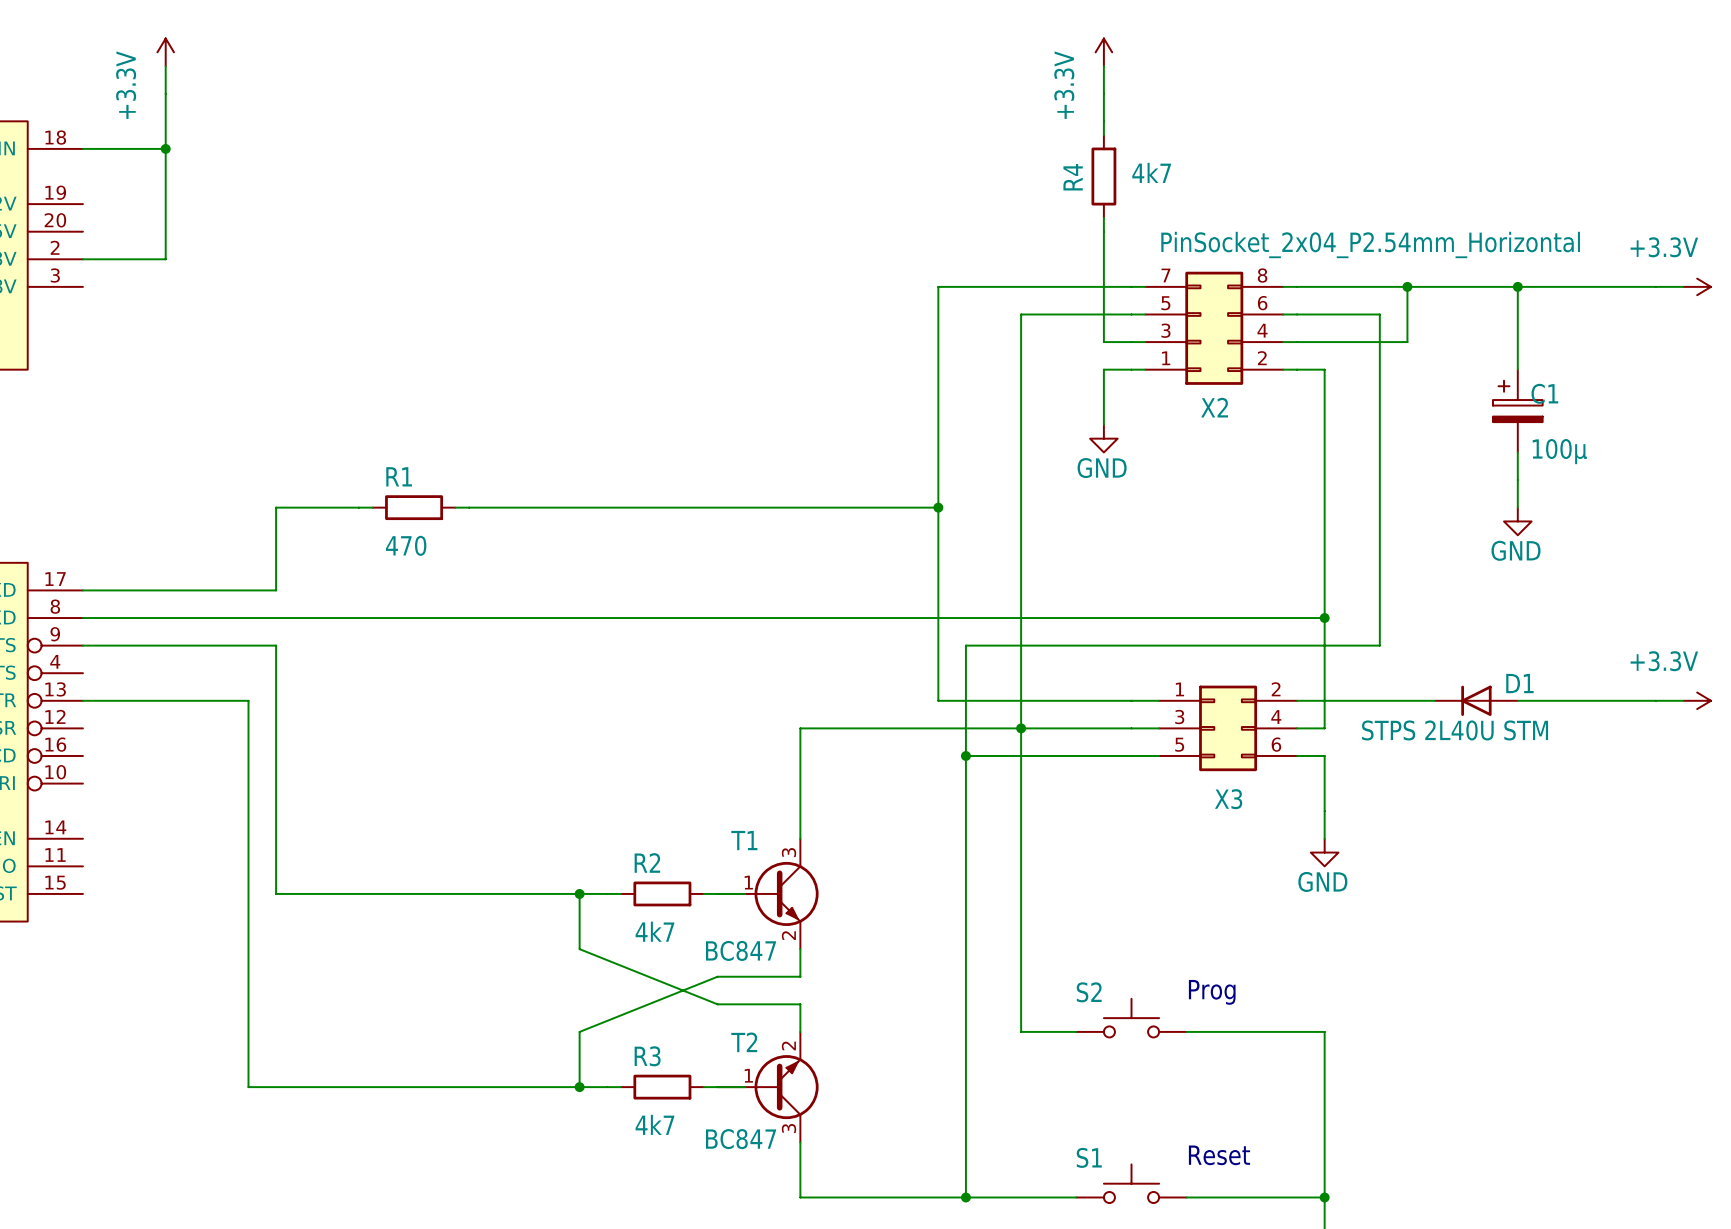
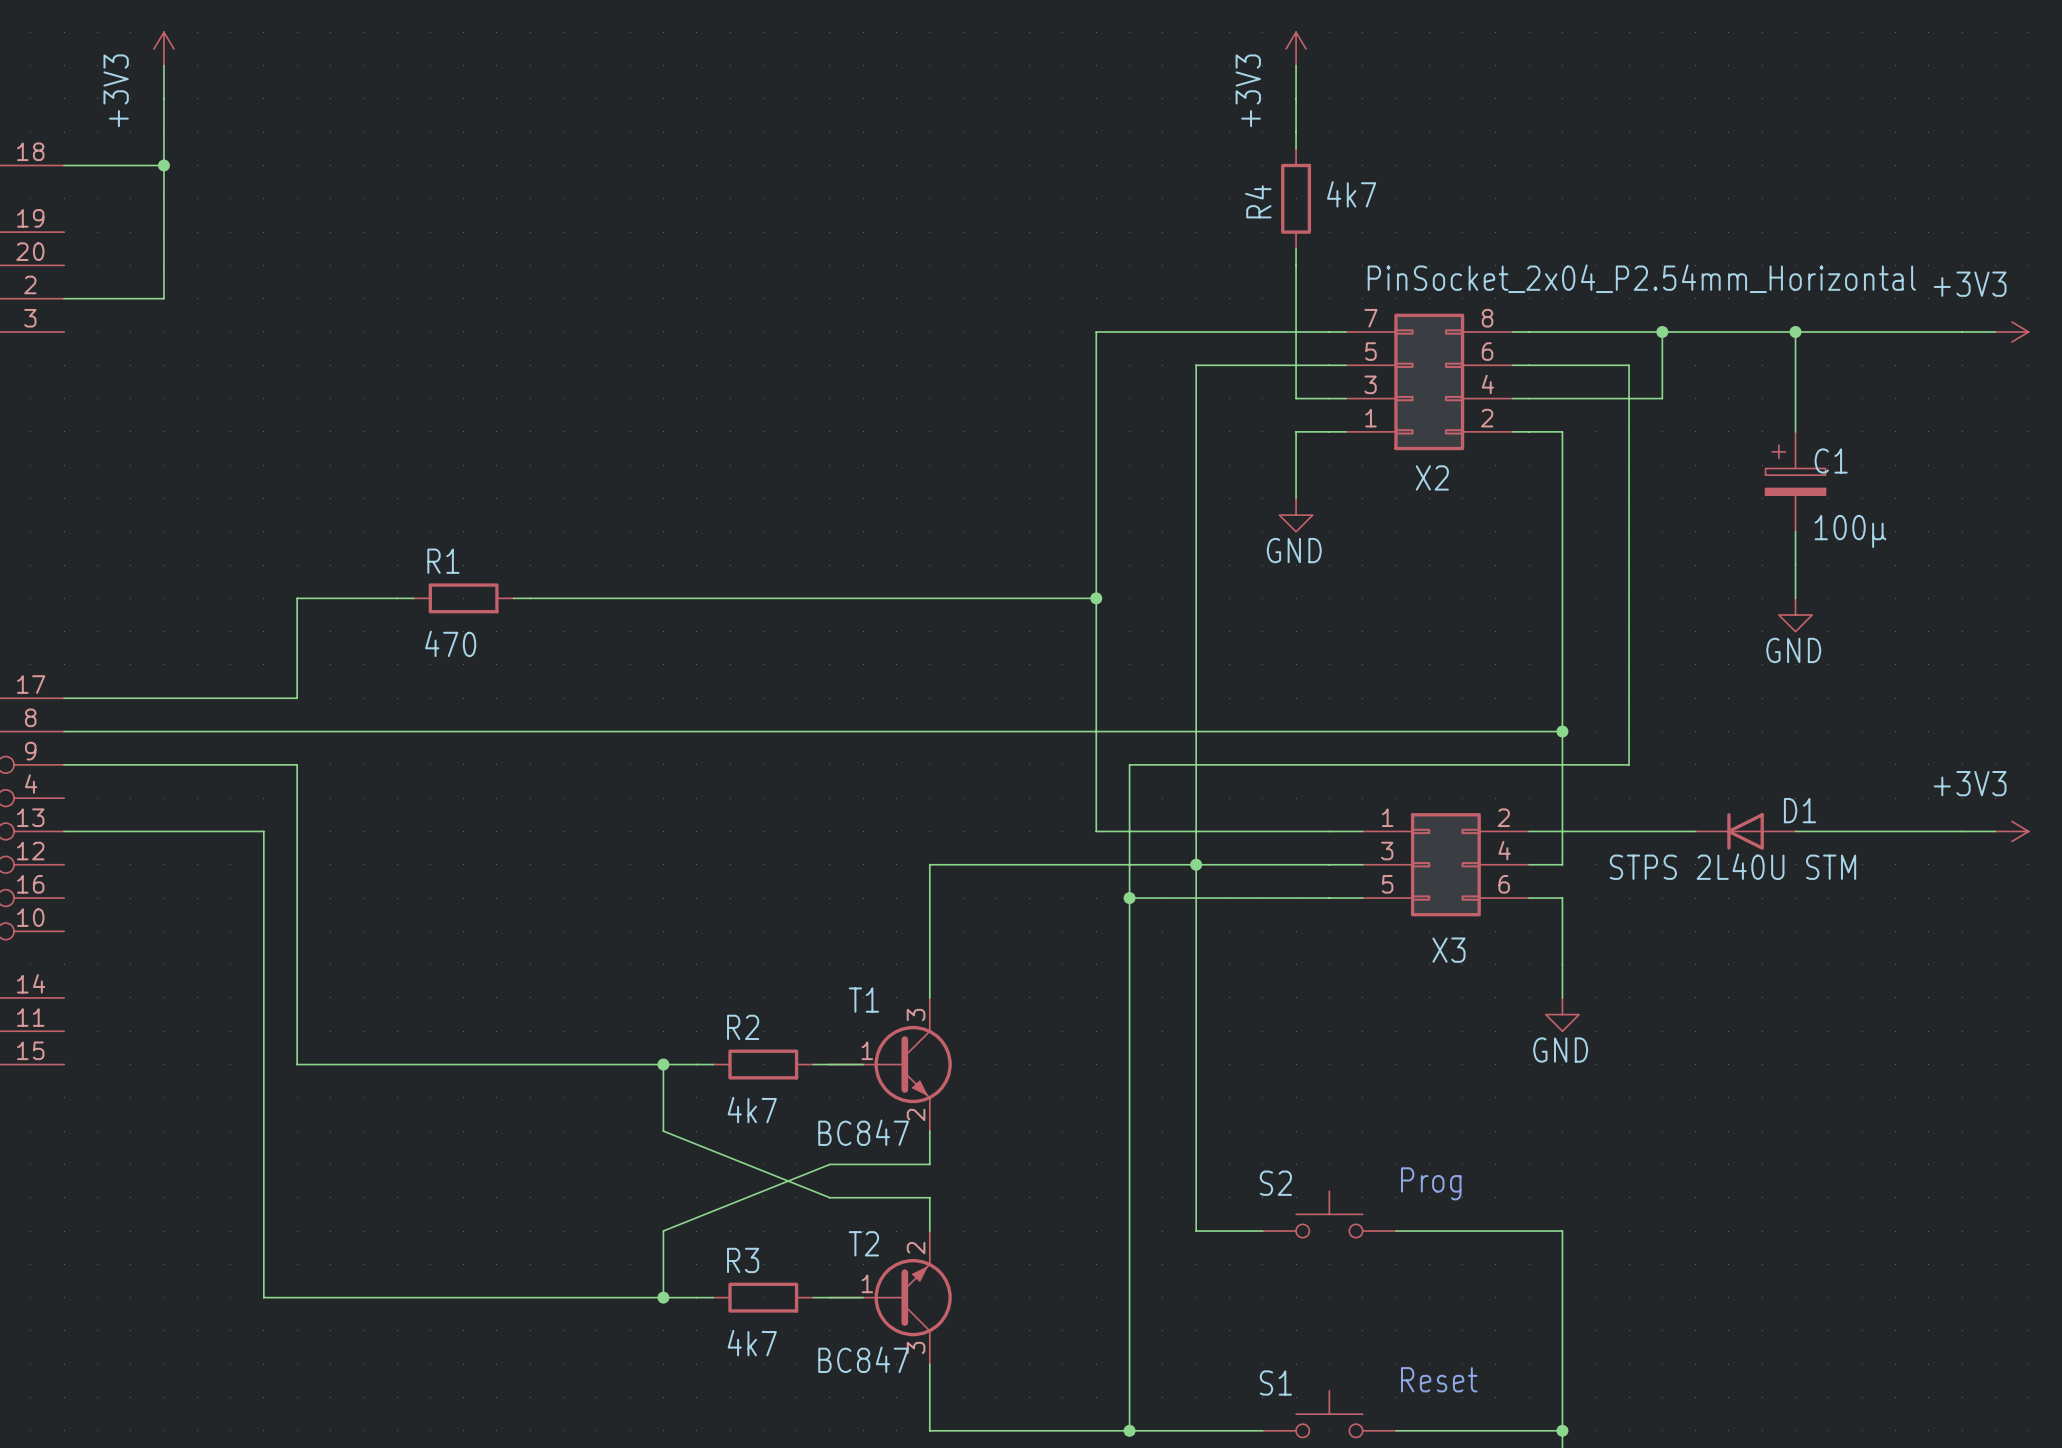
power symbol: +3.3V (165, 52) -> +3V3 (163, 48)
power symbol: +3.3V (1103, 52) -> +3V3 (1296, 48)
power symbol: +3.3V (1697, 286) -> +3V3 (2011, 331)
power symbol: +3.3V (1697, 700) -> +3V3 (2011, 831)

